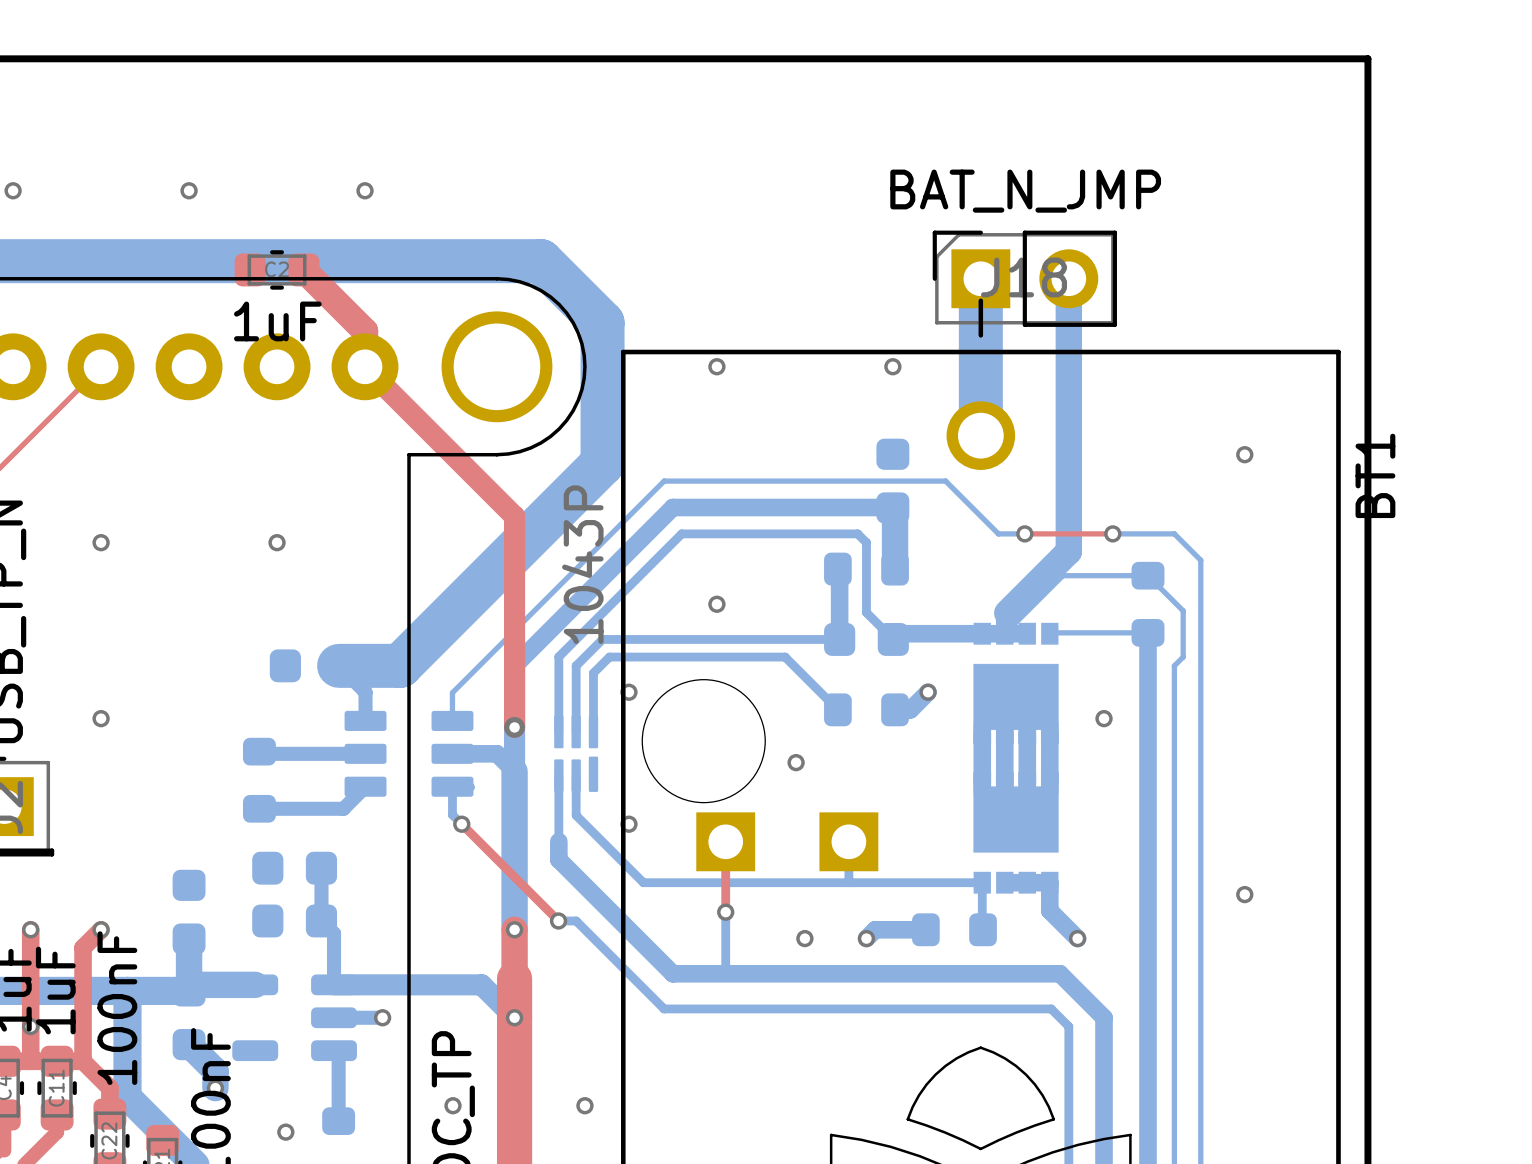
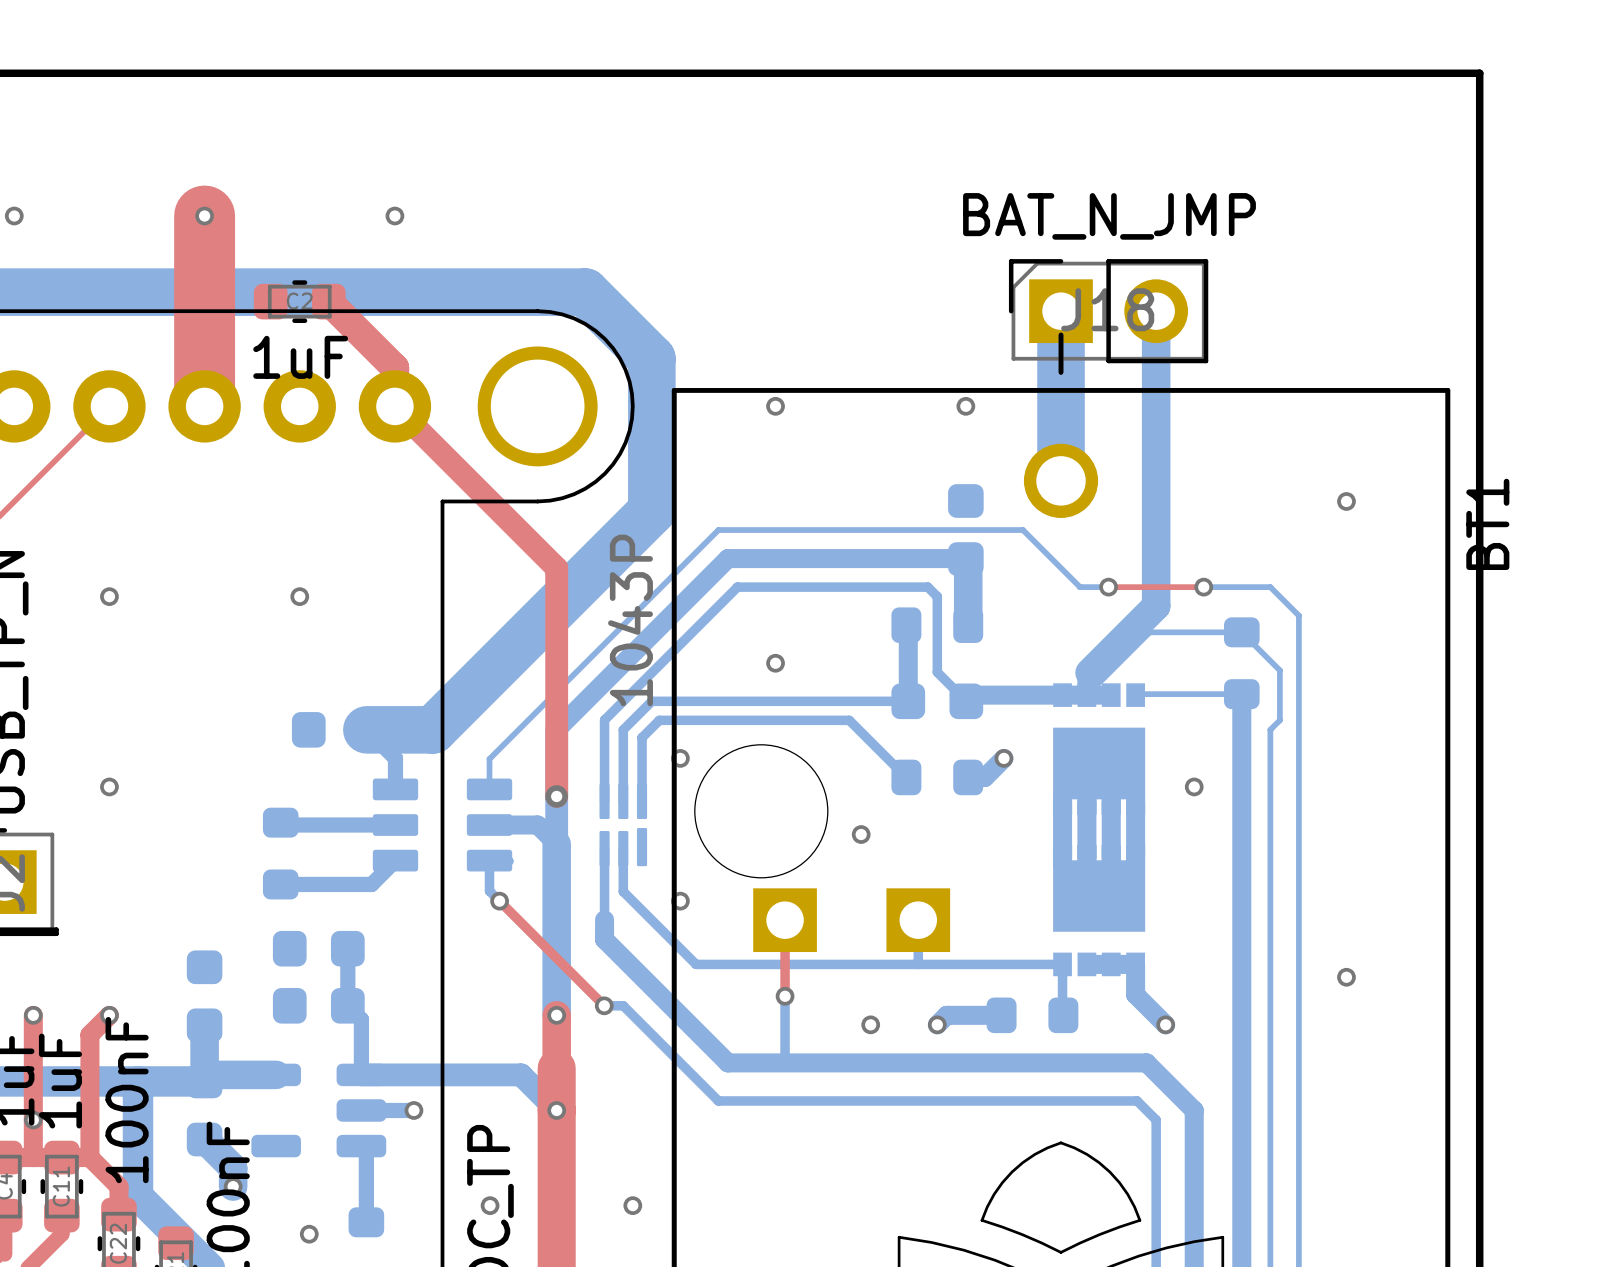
top track: none -> (204, 216) (204, 406)

